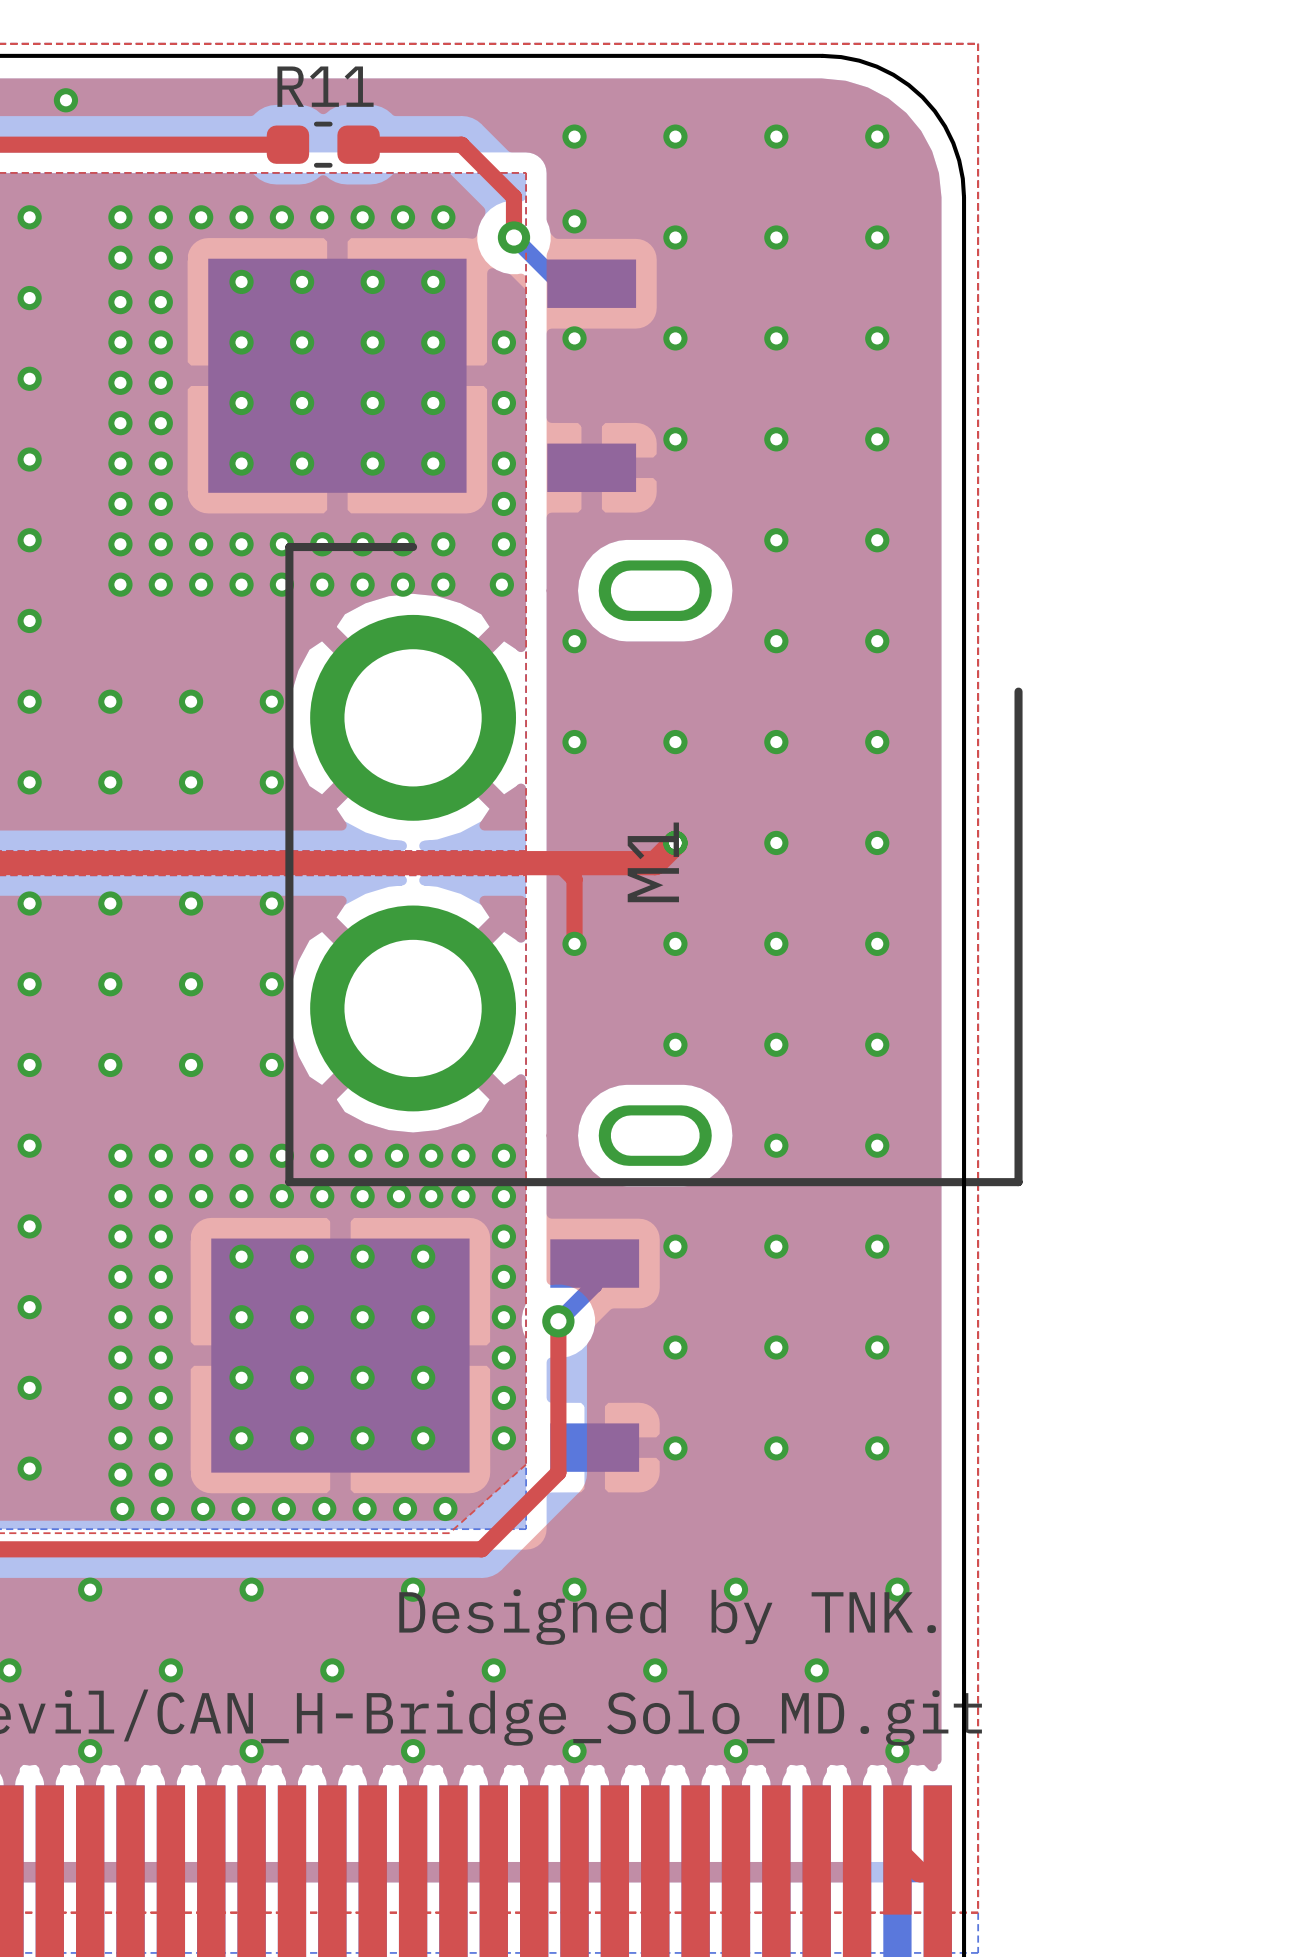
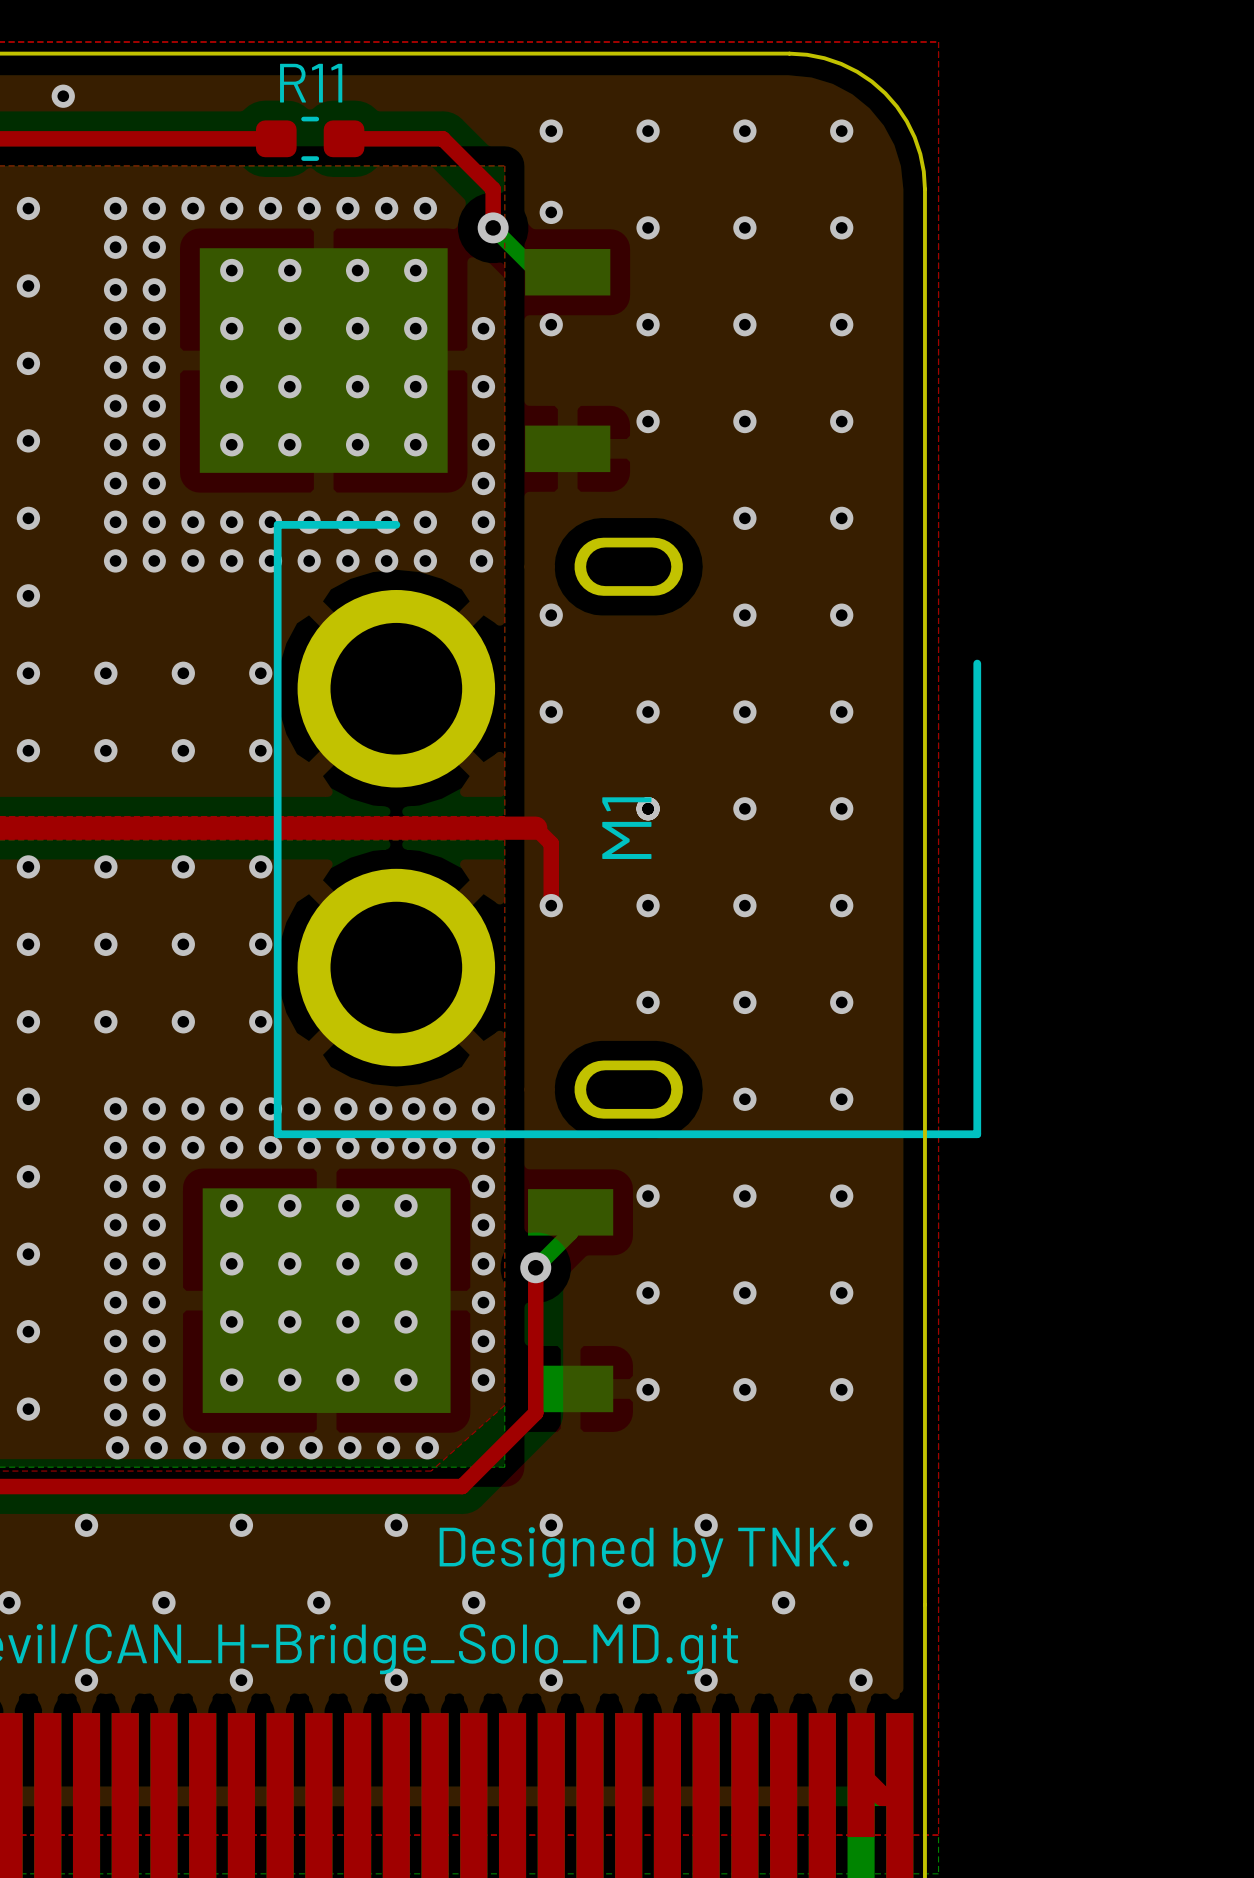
top track: (675, 842) (655, 863) (558, 863) -> none

